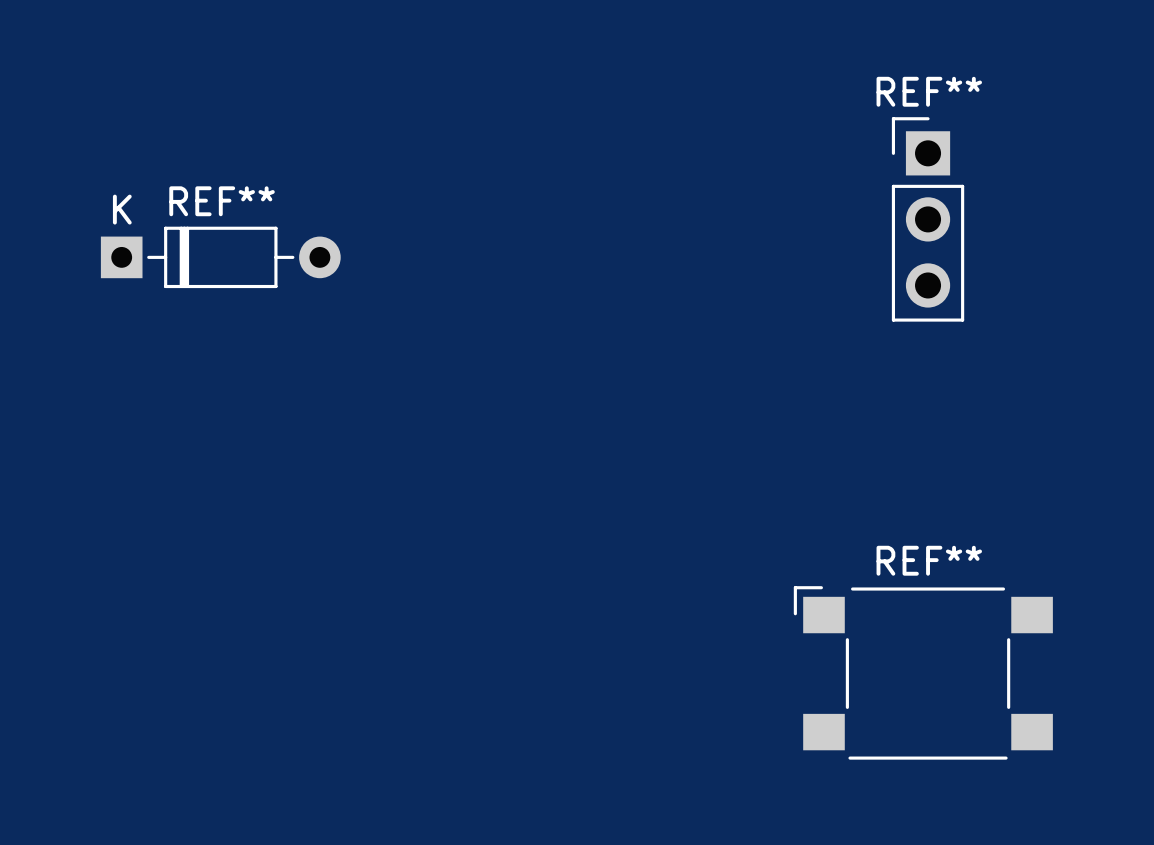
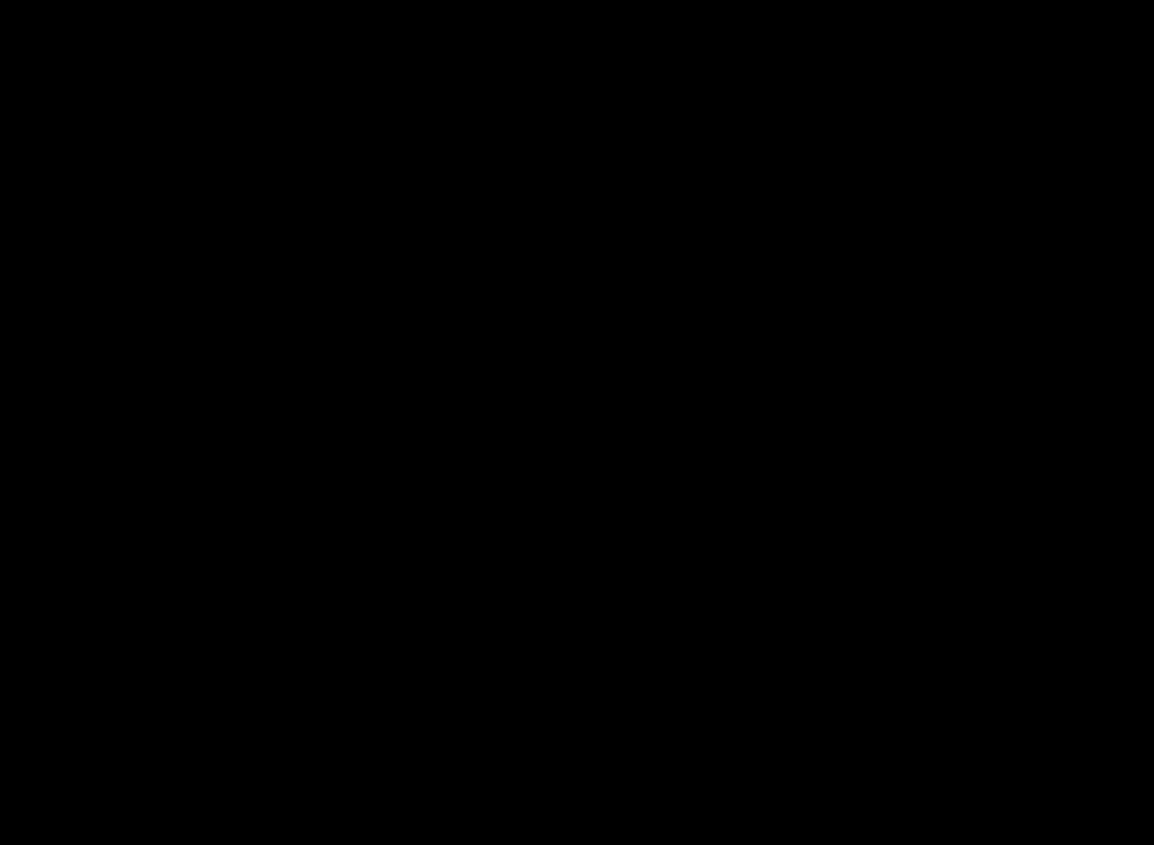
REF**: (928, 219) -> none
REF**: (220, 257) -> none
REF**: (923, 672) -> none

